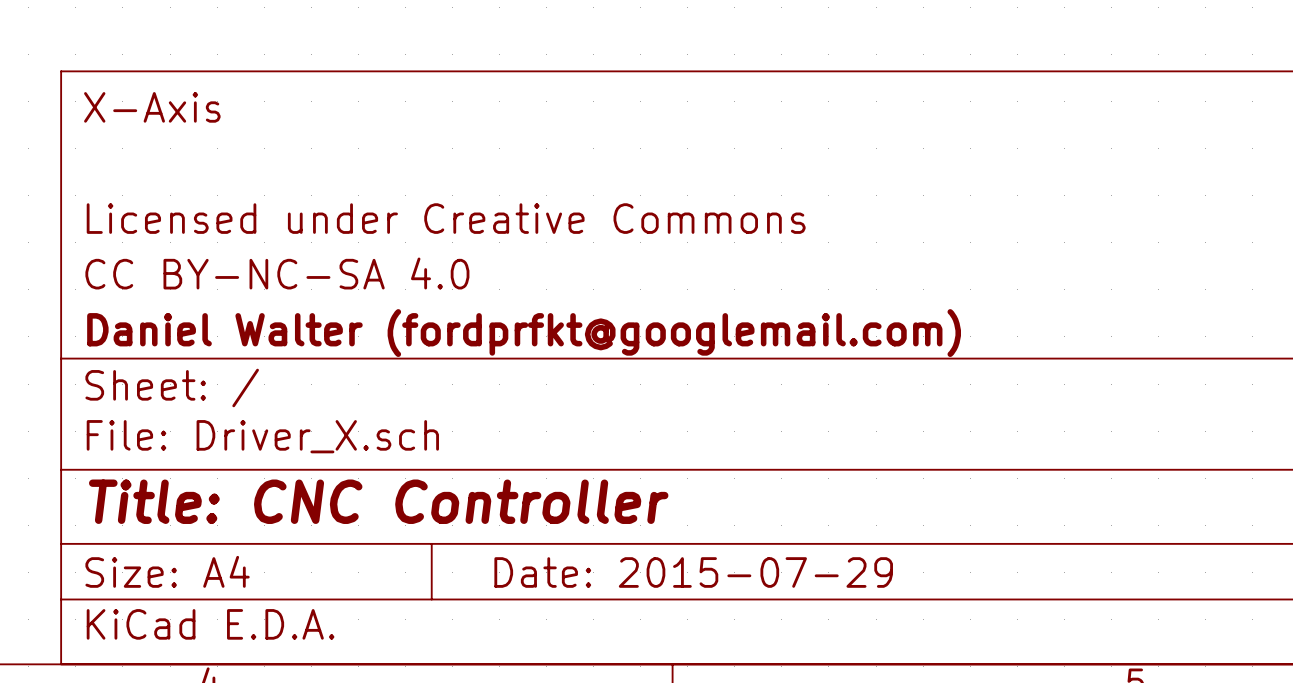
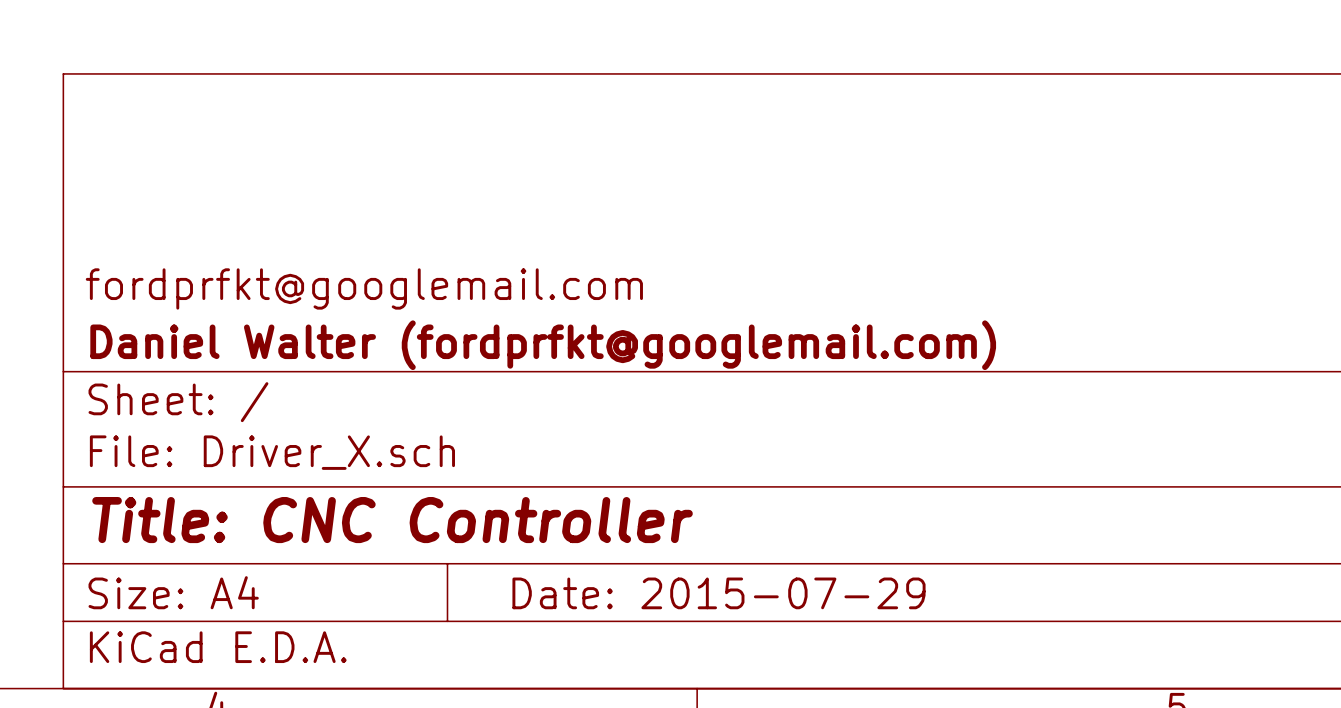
title block: X-Axis (152, 107) -> none
title block: Licensed under Creative Commons (446, 218) -> none
title block: CC BY-NC-SA 4.0 (277, 273) -> fordprfkt@googlemail.com (364, 288)

